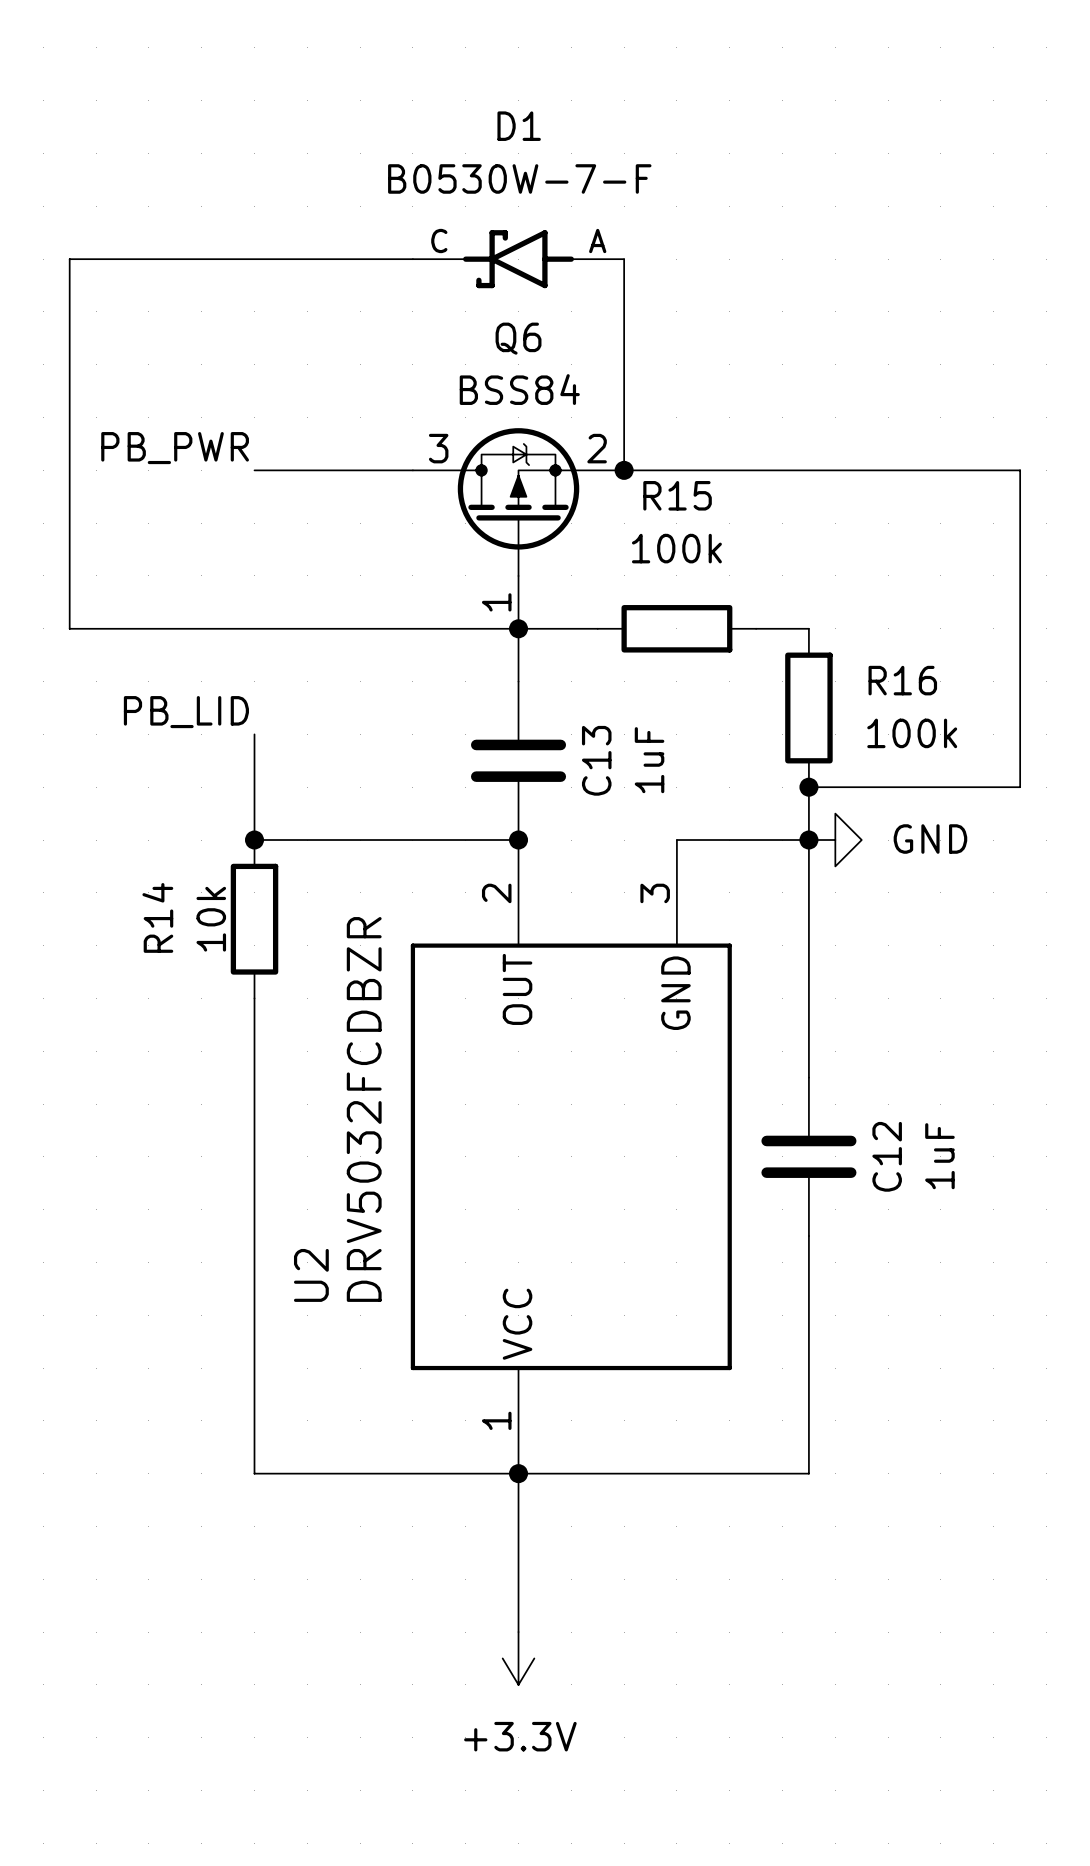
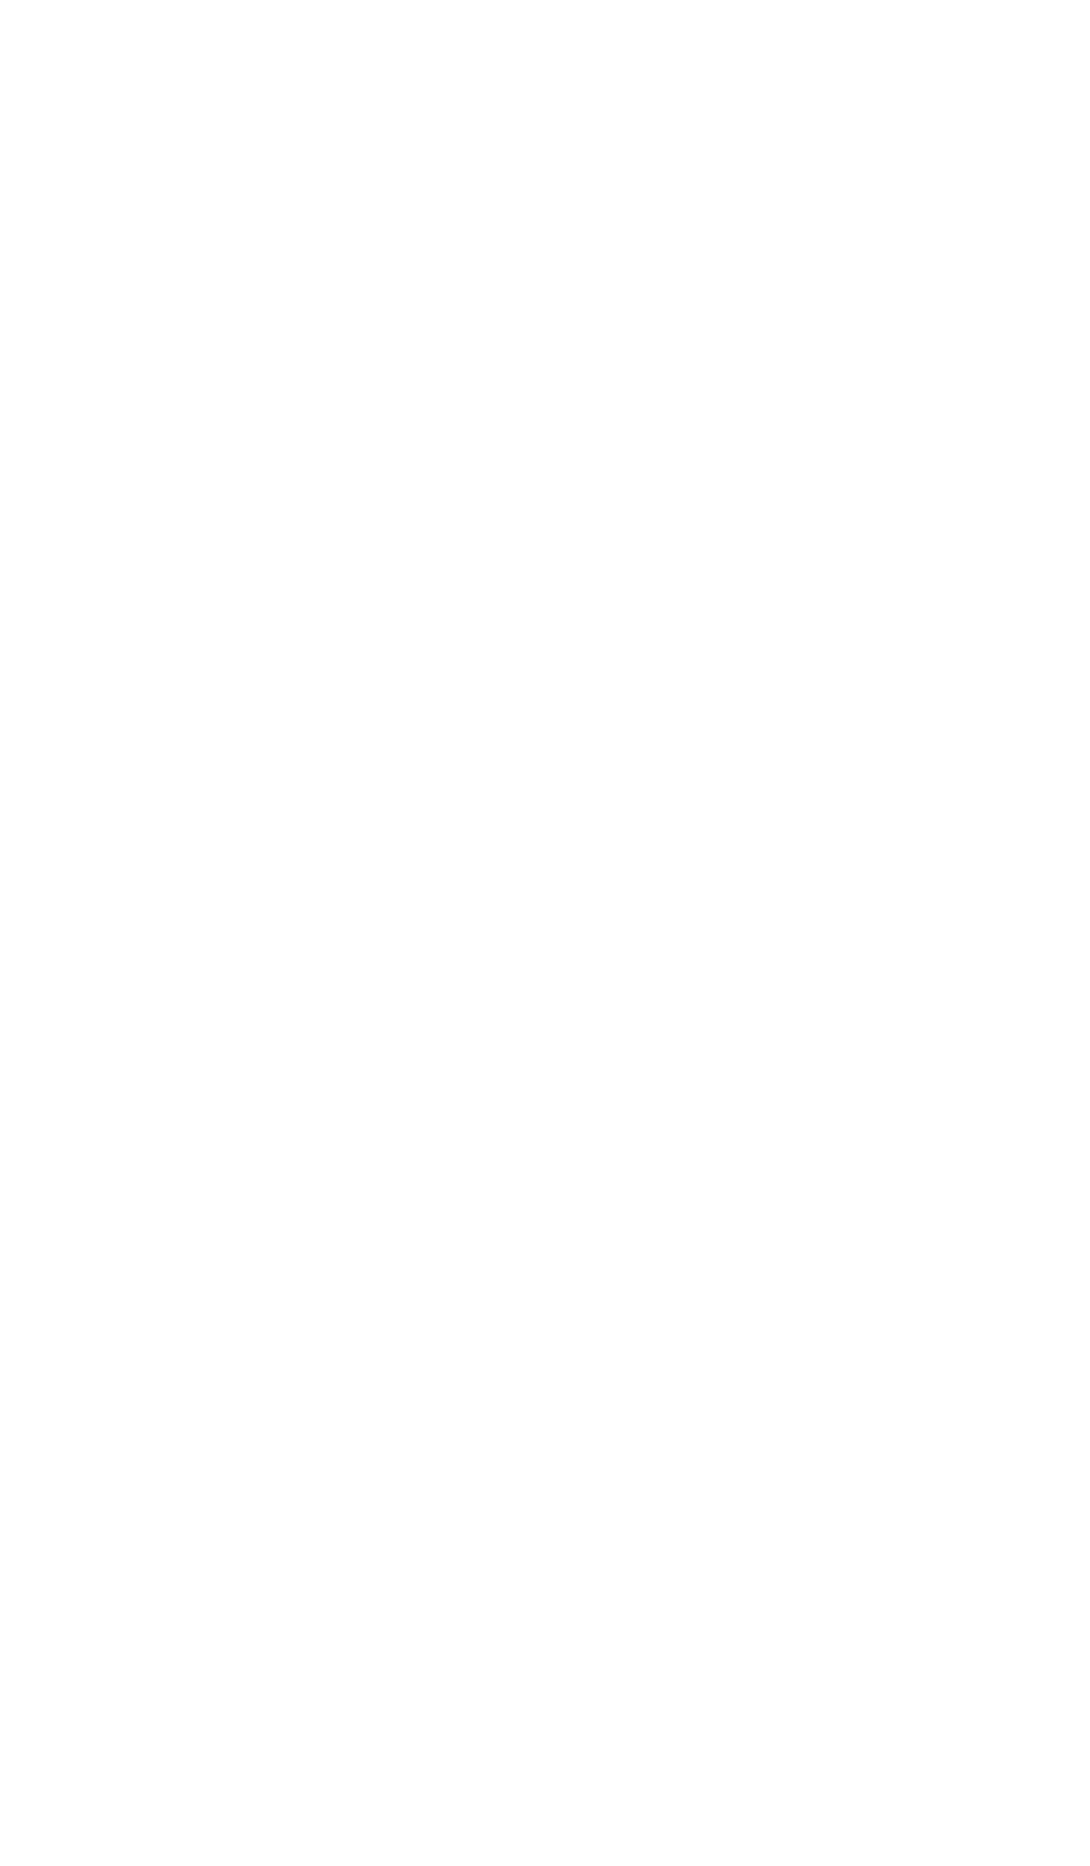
wire: (412, 259) (69, 259) (69, 628) (597, 628) -> none
D1: B0530W-7-F (518, 259) -> none
wire: (624, 259) (624, 470) (1020, 470) (1020, 787) (808, 787) (808, 1077) -> none
label: PB_PWR (175, 448) -> none
wire: (254, 470) (412, 470) -> none
junction: (624, 470) -> none
Q6: BSS84 (518, 528) -> none
wire: (518, 628) (518, 681) -> none
junction: (518, 628) -> none
R15: 100k (676, 628) -> none
wire: (756, 628) (808, 628) -> none
R16: 100k (808, 707) -> none
label: PB_LID (186, 712) -> none
wire: (254, 734) (254, 840) (518, 840) -> none
C13: 1uF (518, 760) -> none
junction: (808, 787) -> none
junction: (254, 840) -> none
junction: (518, 840) -> none
wire: (676, 840) (808, 840) -> none
junction: (808, 840) -> none
power symbol: GND (835, 840) -> none
R14: 10k (254, 919) -> none
wire: (254, 998) (254, 1473) (808, 1473) (808, 1236) -> none
U2: DRV5032FCDBZR (571, 1156) -> none
C12: 1uF (808, 1156) -> none
wire: (518, 1473) (518, 1632) -> none
junction: (518, 1473) -> none
power symbol: +3.3V (518, 1658) -> none

